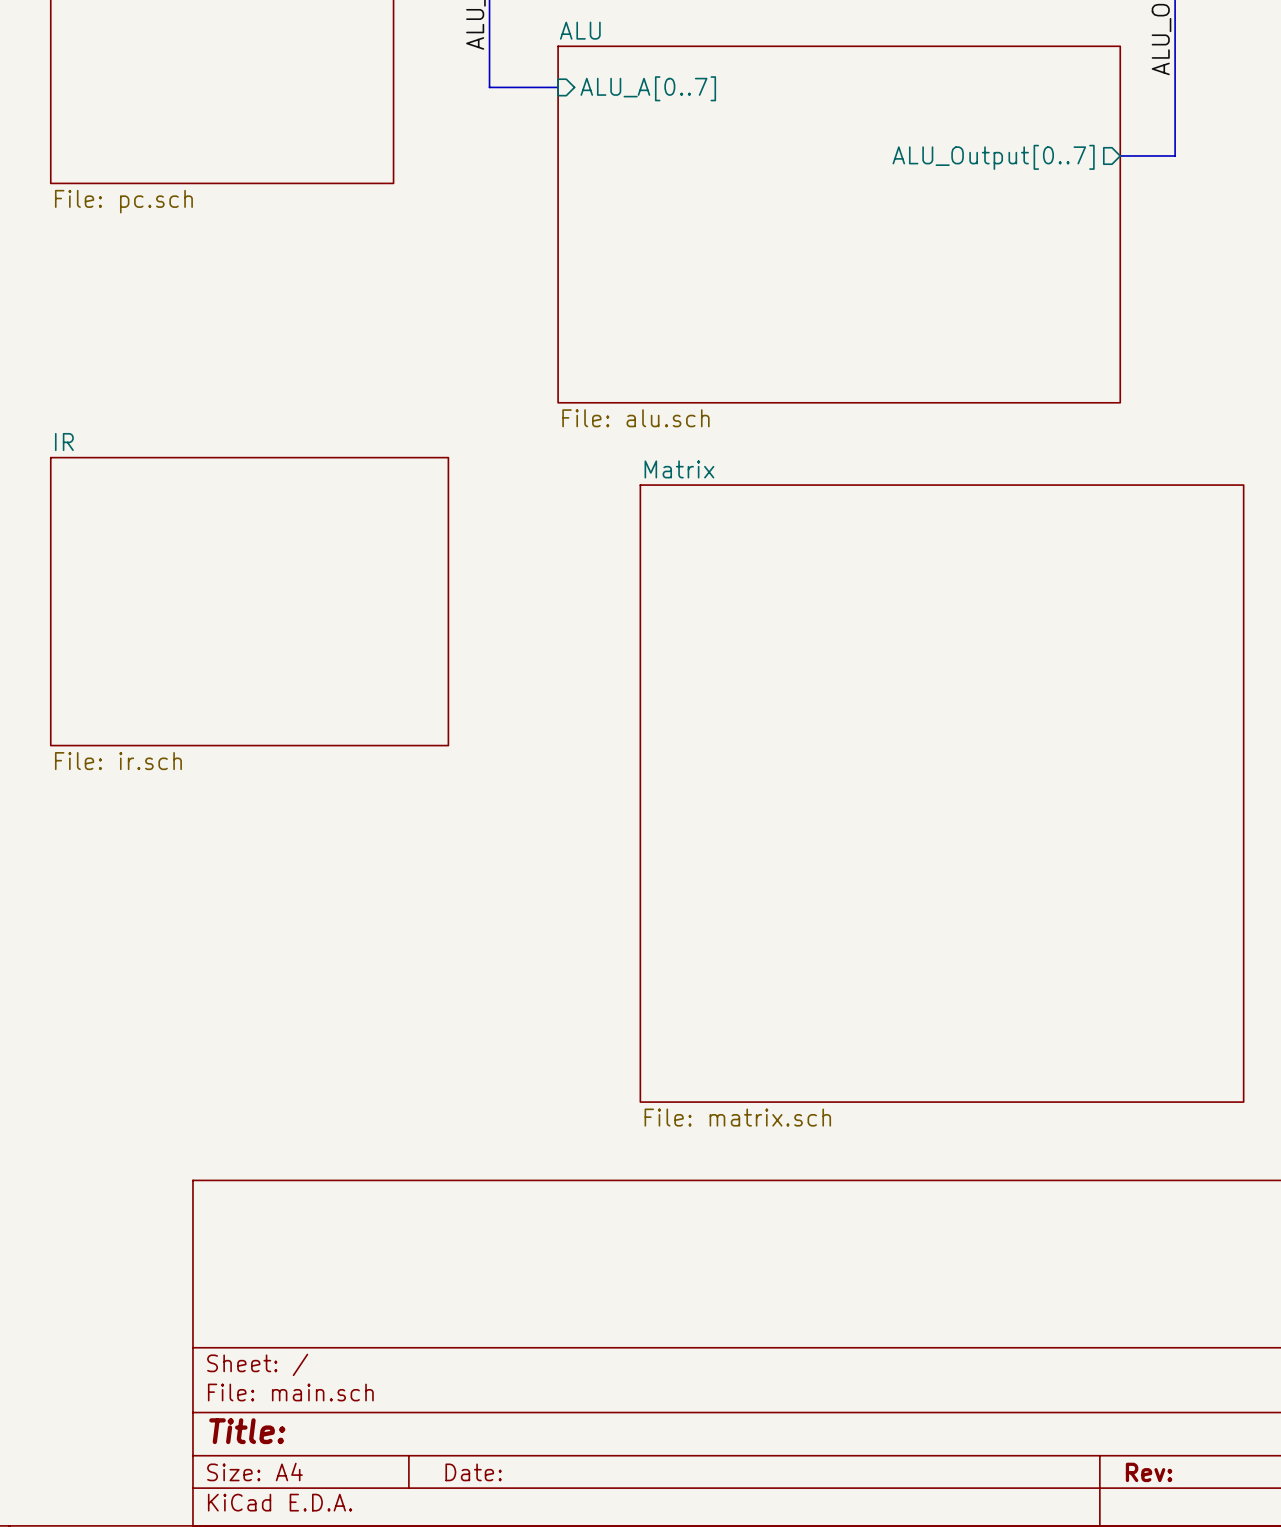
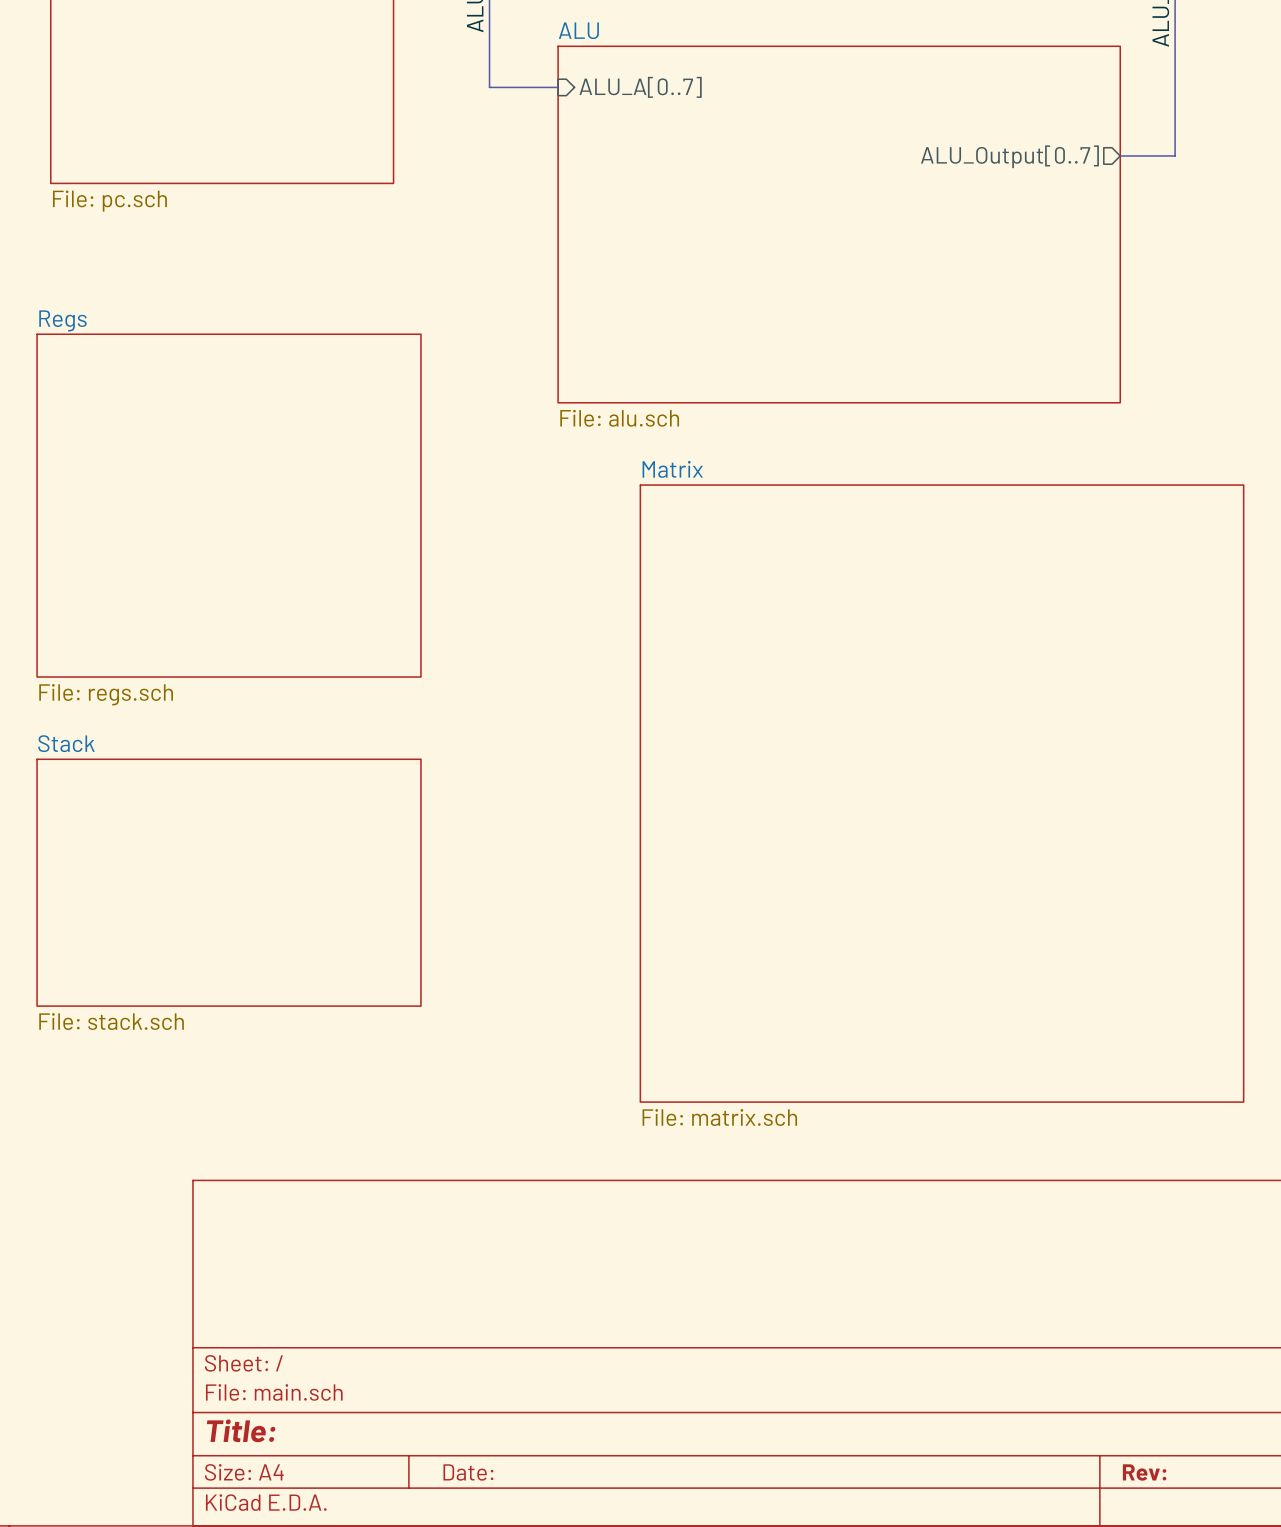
sheet Regs: none -> File: regs.sch (229, 505)
sheet IR: File: ir.sch (249, 601) -> none
sheet Stack: none -> File: stack.sch (229, 882)

